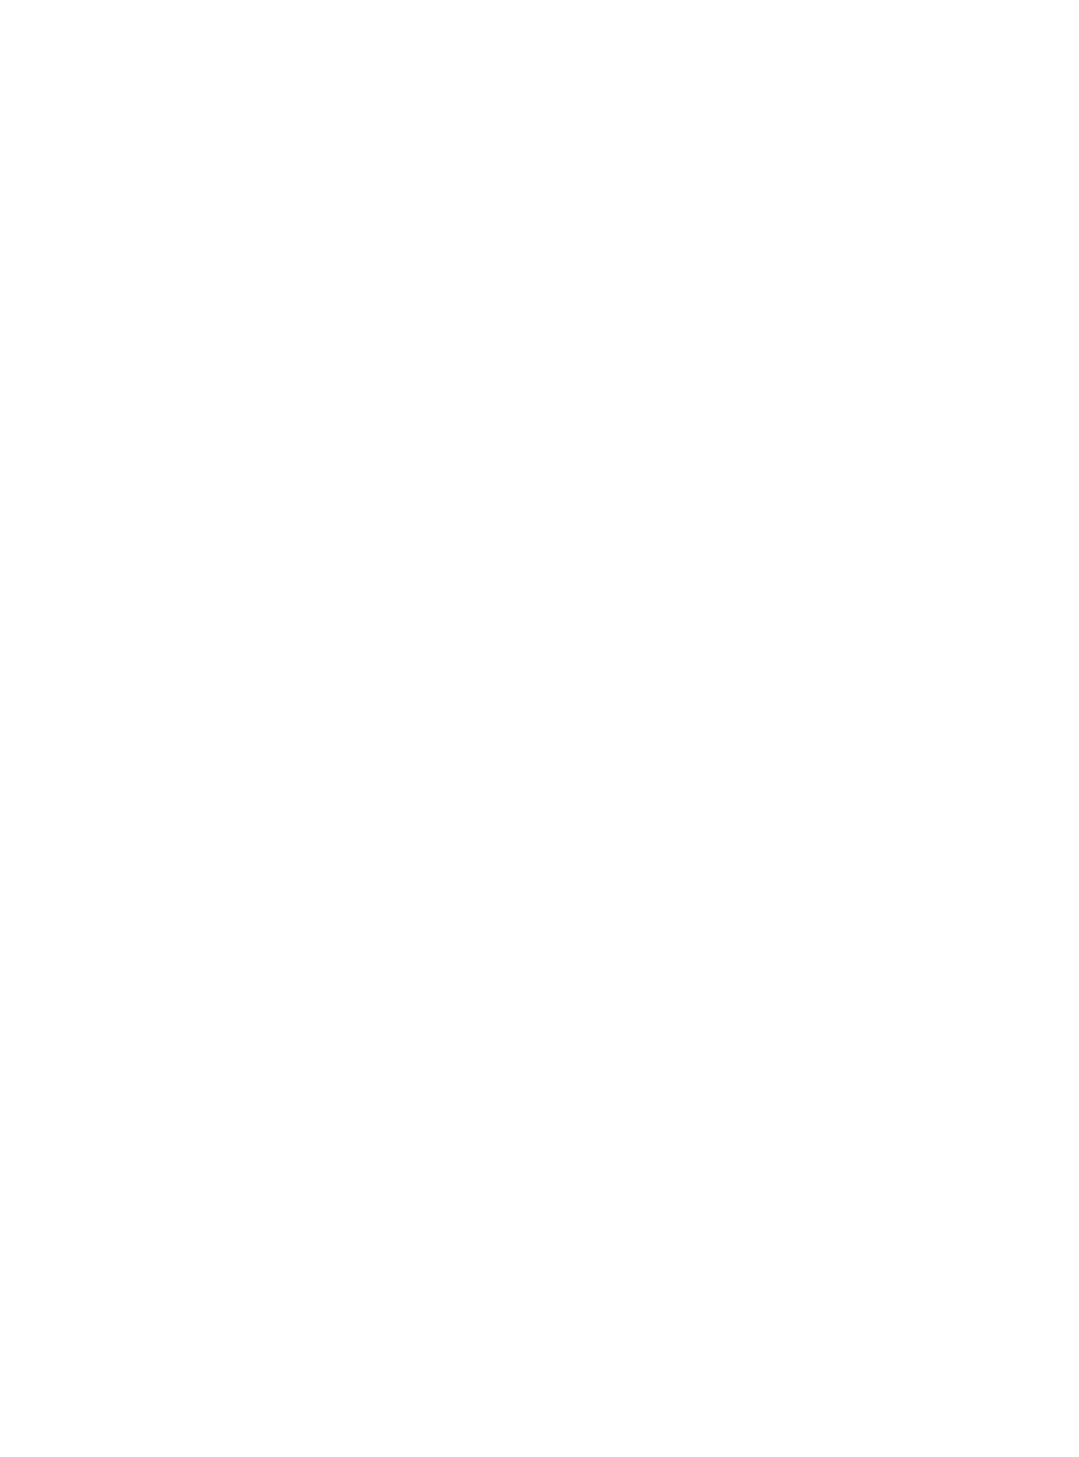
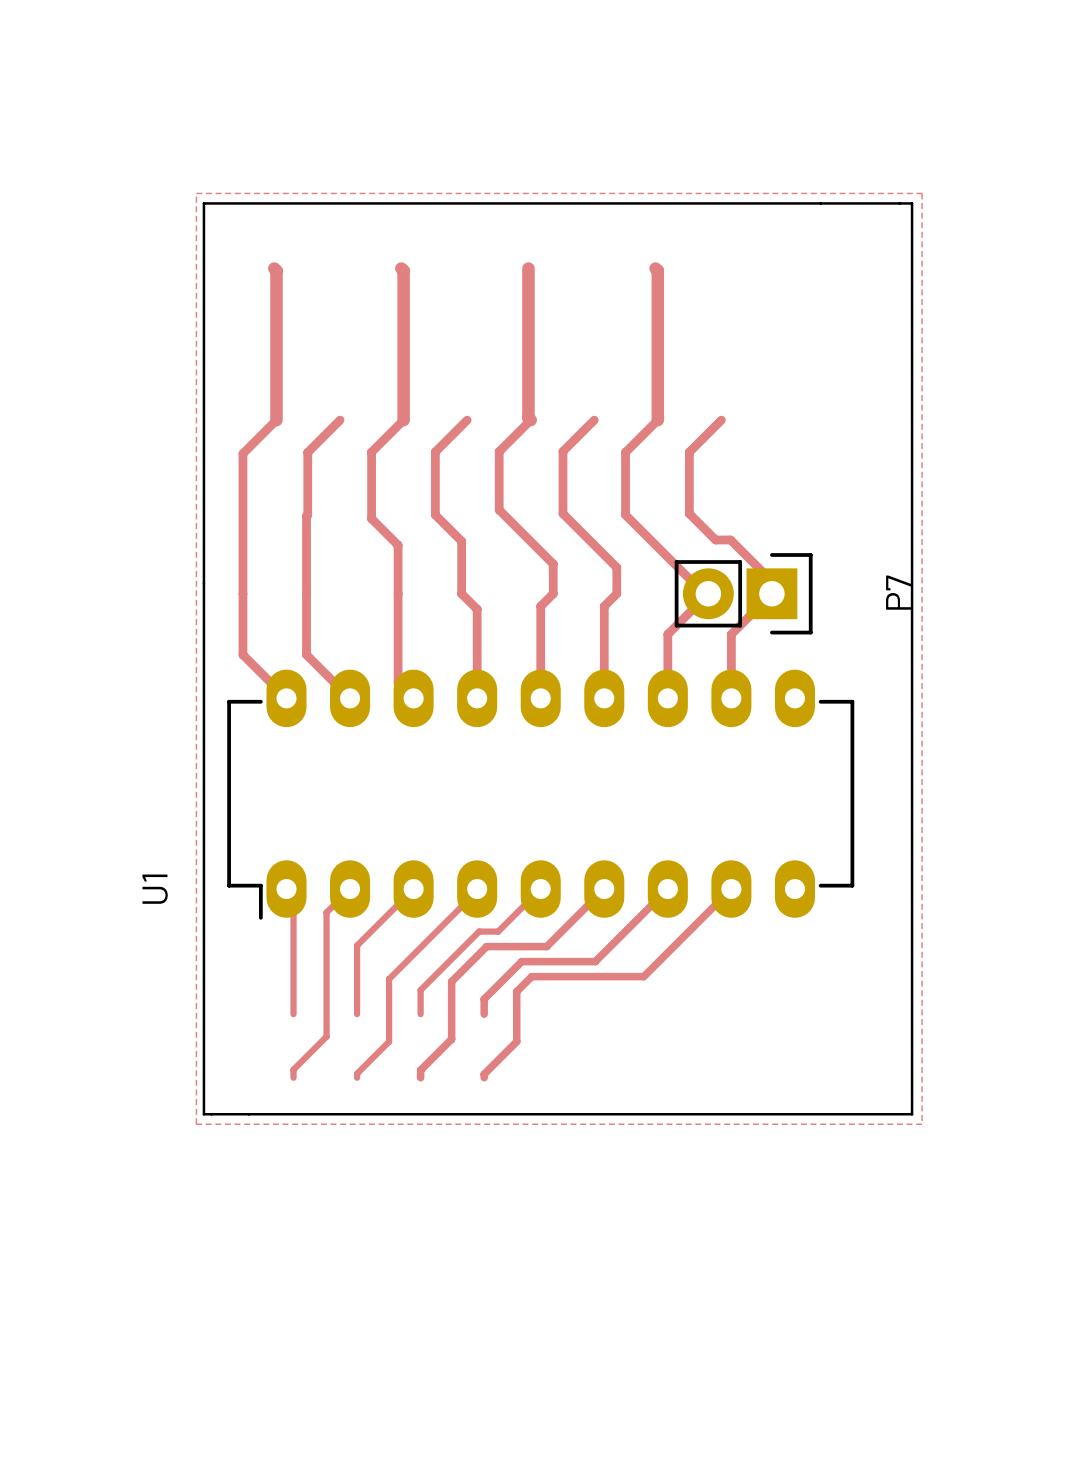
zone outline: none -> (196, 193) (922, 193) (922, 1124) (196, 1124) (196, 193)
board edge: none -> (203, 203) (203, 1114) (912, 1114) (912, 203) (203, 203)
track: none -> (274, 268) (276, 270) (276, 420) (242, 453) (242, 654) (286, 698)
track: none -> (401, 268) (403, 270) (403, 420) (371, 452) (371, 518) (398, 545) (398, 682) (413, 698)
track: none -> (528, 268) (528, 417) (530, 420) (499, 451) (499, 509) (553, 564) (553, 593) (540, 606) (540, 698)
track: none -> (655, 268) (657, 270) (657, 420) (625, 452) (625, 514) (704, 593) (708, 593) (667, 634) (667, 698)
track: none -> (340, 420) (307, 452) (306, 654) (350, 698)
track: none -> (467, 420) (435, 451) (435, 514) (461, 541) (461, 593) (477, 609) (477, 698)
track: none -> (594, 420) (563, 451) (563, 513) (616, 567) (616, 593) (604, 606) (604, 698)
track: none -> (721, 420) (689, 452) (689, 513) (715, 539) (730, 539) (771, 581) (771, 593) (731, 634) (731, 698)
P7: none -> (743, 593)
U1: none -> (540, 794)
track: none -> (286, 889) (293, 896) (293, 1014)
track: none -> (350, 889) (326, 912) (326, 1036) (293, 1069) (293, 1077)
track: none -> (413, 889) (357, 945) (357, 1014)
track: none -> (477, 889) (389, 979) (389, 1041) (357, 1073) (357, 1077)
track: none -> (540, 889) (498, 931) (479, 931) (420, 990) (420, 1014)
track: none -> (604, 889) (546, 946) (486, 946) (451, 981) (451, 1039) (420, 1070) (420, 1077)
track: none -> (667, 889) (595, 961) (521, 961) (484, 999) (484, 1014)
track: none -> (731, 889) (643, 976) (531, 976) (516, 991) (516, 1041) (484, 1074) (484, 1077)

